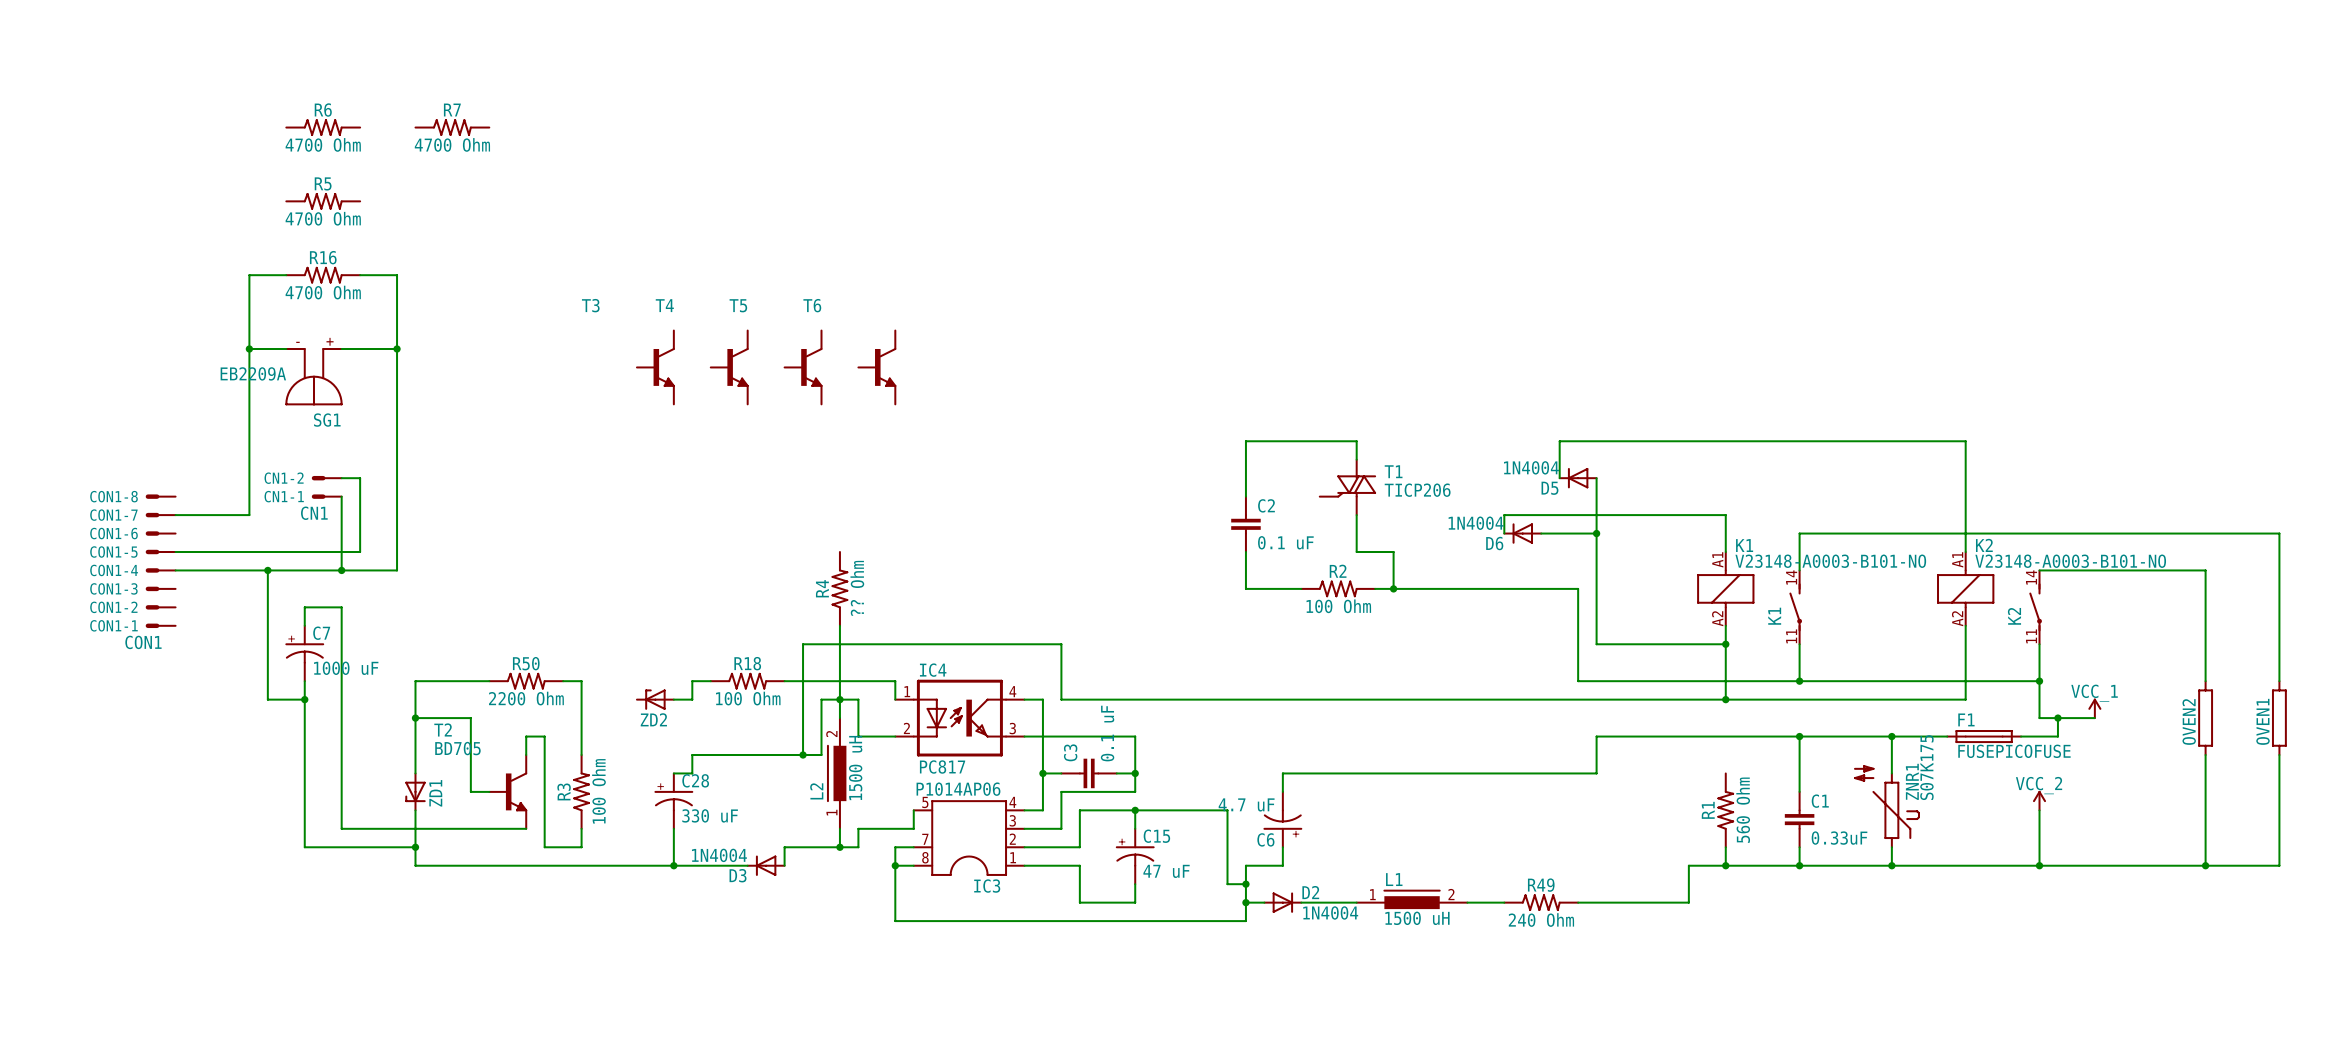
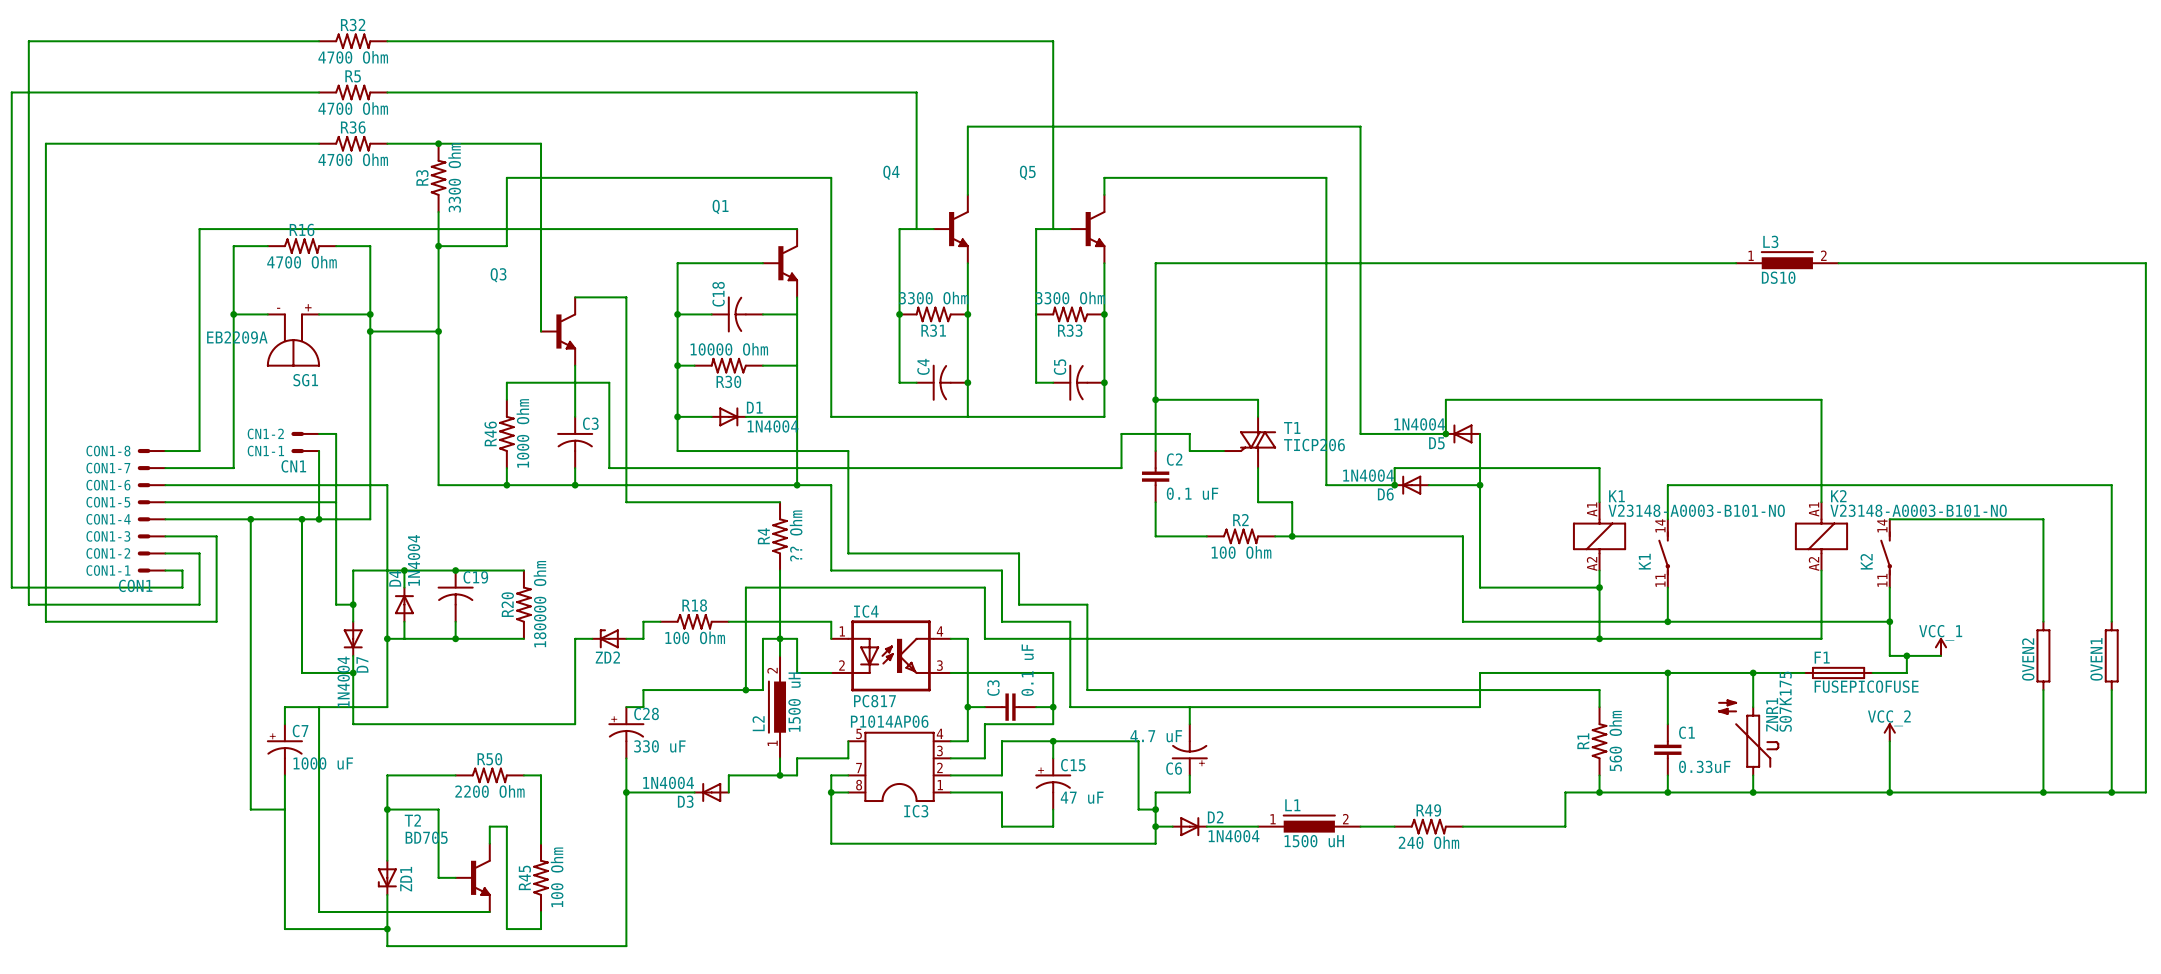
wire: none -> (319, 41) (28, 41) (28, 604) (199, 604) (199, 553) (165, 553)
R32: none -> 4700 Ohm (353, 41)
wire: none -> (387, 41) (1053, 41) (1053, 229)
wire: none -> (319, 92) (11, 92) (11, 587) (182, 587) (182, 570) (165, 570)
wire: none -> (387, 92) (916, 92) (916, 229)
R6: 4700 Ohm (323, 127) -> none
R7: 4700 Ohm (452, 127) -> none
wire: none -> (319, 143) (45, 143) (45, 621) (216, 621) (216, 536) (165, 536)
R36: none -> 4700 Ohm (353, 143)
wire: none -> (387, 143) (541, 143) (541, 331)
junction: none -> (438, 143)
R5 position: (323, 201) -> (353, 92)
wire: none -> (967, 194) (967, 126) (1360, 126) (1360, 433) (1445, 433)
wire: none -> (1104, 194) (1104, 177) (1326, 177) (1326, 485) (1394, 485)
wire: none -> (438, 212) (438, 485) (831, 485) (831, 570) (1001, 570) (1001, 621) (1070, 621) (1070, 707) (1189, 707)
wire: none -> (797, 229) (199, 229) (199, 451) (165, 451)
wire: none -> (933, 229) (899, 229) (899, 382) (916, 382)
Q4: none -> (951, 229)
wire: none -> (1070, 229) (1036, 229) (1036, 382) (1053, 382)
Q5: none -> (1087, 229)
wire: none -> (438, 246) (506, 246) (506, 177) (831, 177) (831, 416) (1104, 416) (1104, 263)
junction: none -> (438, 246)
L3: none -> DS10 (1787, 260)
wire: none -> (762, 263) (677, 263) (677, 451) (848, 451) (848, 553) (1019, 553) (1019, 604) (1087, 604) (1087, 690) (1599, 690) (1599, 707)
Q1: none -> (780, 263)
wire: none -> (967, 263) (967, 416)
wire: none -> (1736, 263) (1155, 263) (1155, 399)
wire: none -> (1838, 263) (2145, 263) (2145, 792) (2111, 792)
wire: none -> (575, 297) (626, 297) (626, 502) (780, 502)
wire: none -> (797, 297) (797, 485)
wire: none -> (677, 314) (711, 314)
junction: none -> (677, 314)
C18: none -> (737, 314)
wire: none -> (762, 314) (797, 314)
junction: none -> (899, 314)
R31: none -> 3300 Ohm (933, 314)
junction: none -> (967, 314)
R33: none -> 3300 Ohm (1070, 314)
junction: none -> (1104, 314)
wire: none -> (370, 331) (438, 331)
junction: none -> (370, 331)
junction: none -> (438, 331)
Q3: none -> (558, 331)
T3: (655, 367) -> none
T4: (729, 367) -> none
T5: (803, 367) -> none
T6: (877, 367) -> none
wire: none -> (575, 365) (575, 416)
wire: none -> (677, 365) (694, 365)
junction: none -> (677, 365)
R30: none -> 10000 Ohm (728, 365)
wire: none -> (762, 365) (797, 365)
C4: none -> (942, 382)
junction: none -> (967, 382)
C5: none -> (1078, 382)
junction: none -> (1104, 382)
wire: none -> (506, 399) (506, 382) (609, 382) (609, 468) (1121, 468) (1121, 433) (1189, 433) (1189, 451) (1223, 451)
junction: none -> (1155, 399)
wire: none -> (677, 416) (711, 416)
junction: none -> (677, 416)
D1: none -> 1N4004 (728, 416)
wire: none -> (745, 416) (797, 416)
R46: none -> 1000 Ohm (506, 433)
junction: none -> (1445, 433)
C3: none -> (575, 442)
wire: none -> (506, 468) (506, 485)
wire: none -> (575, 468) (575, 485)
wire: none -> (165, 485) (387, 485) (387, 621)
junction: none -> (506, 485)
junction: none -> (575, 485)
junction: none -> (797, 485)
junction: none -> (1394, 485)
wire: none -> (336, 502) (336, 604) (353, 604)
wire: none -> (301, 519) (301, 672) (353, 672)
junction: none -> (301, 519)
wire: (304, 625) (304, 607) (341, 607) (341, 773) -> none
wire: none -> (404, 570) (404, 587)
junction: none -> (404, 570)
junction: none -> (455, 570)
wire: none -> (523, 570) (353, 570) (353, 621)
C7 position: (304, 653) -> (284, 749)
C19: none -> (455, 596)
junction: none -> (353, 604)
D4: none -> 1N4004 (404, 604)
R20: none -> 180000 Ohm (523, 604)
wire: (304, 681) (304, 773) -> (387, 707) (284, 707)
wire: (415, 681) (489, 681) -> (455, 638) (455, 621)
wire: none -> (404, 621) (404, 638)
R50 position: (526, 681) -> (489, 775)
wire: (563, 681) (581, 681) (581, 755) -> none
wire: (267, 699) (304, 699) -> (250, 638) (250, 809) (284, 809)
junction: (304, 699) -> none
D7: none -> 1N4004 (353, 638)
wire: none -> (387, 638) (523, 638)
junction: none -> (455, 638)
wire: none -> (592, 638) (575, 638) (575, 724) (455, 724)
wire: (415, 718) (470, 718) (470, 791) -> (353, 655) (353, 724) (438, 724)
junction position: (415, 718) -> (387, 638)
junction: none -> (353, 672)
wire: (526, 755) (526, 736) (544, 736) (544, 847) (563, 847) -> none
wire: (304, 791) (304, 847) (415, 847) (415, 810) -> none
ZD1 position: (415, 791) -> (387, 877)
T2 position: (508, 791) -> (472, 877)
R3 position: (581, 791) -> (438, 177)
R3 value: 100 Ohm (598, 791) -> 3300 Ohm (454, 177)
wire: (341, 828) (526, 828) -> (319, 758) (319, 911) (489, 911)
wire: (581, 828) (581, 847) -> (541, 843) (541, 775)
wire: none -> (284, 775) (284, 929) (387, 929)
wire: none -> (387, 775) (455, 775)
junction position: (415, 847) -> (387, 809)
wire: (415, 865) (673, 865) -> (387, 894) (387, 946) (626, 946) (626, 792)
wire: none -> (387, 792) (387, 860)
junction: none -> (2111, 792)
wire: none -> (387, 809) (438, 809) (438, 877) (455, 877)
wire: none -> (489, 843) (489, 826) (506, 826) (506, 929) (541, 929) (541, 911)
R45: none -> 100 Ohm (541, 877)
junction: none -> (387, 929)

